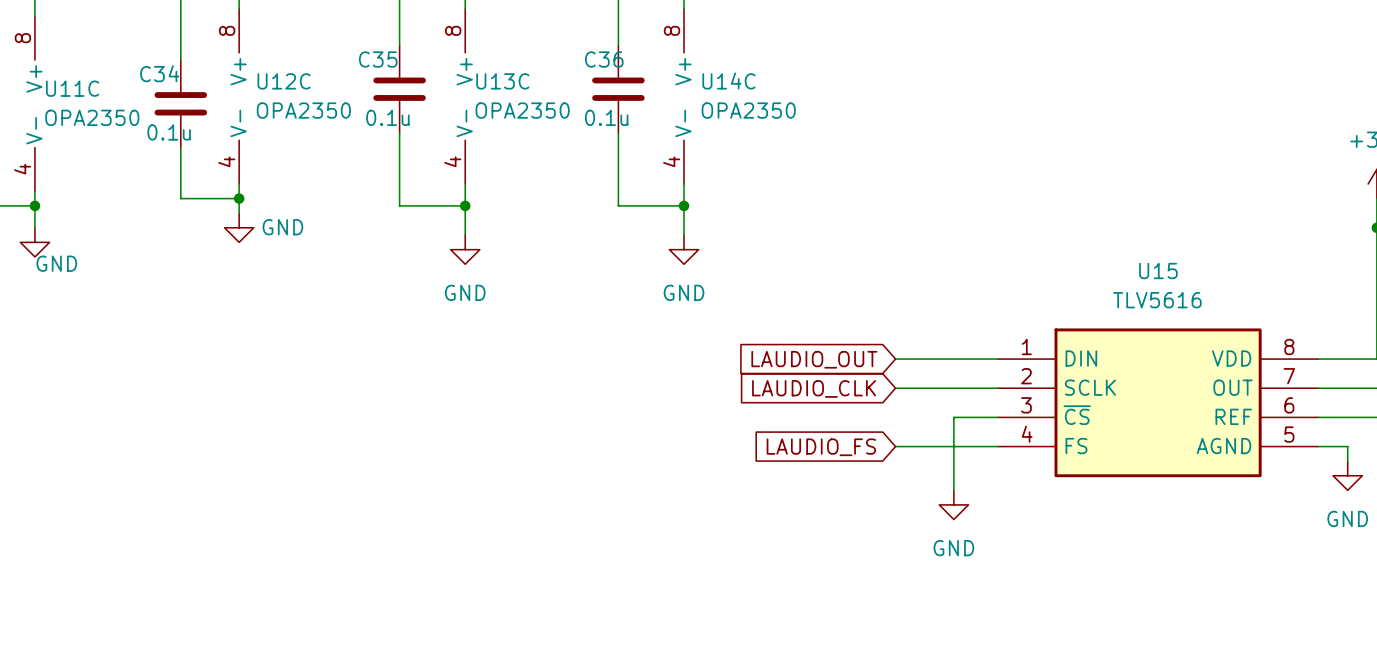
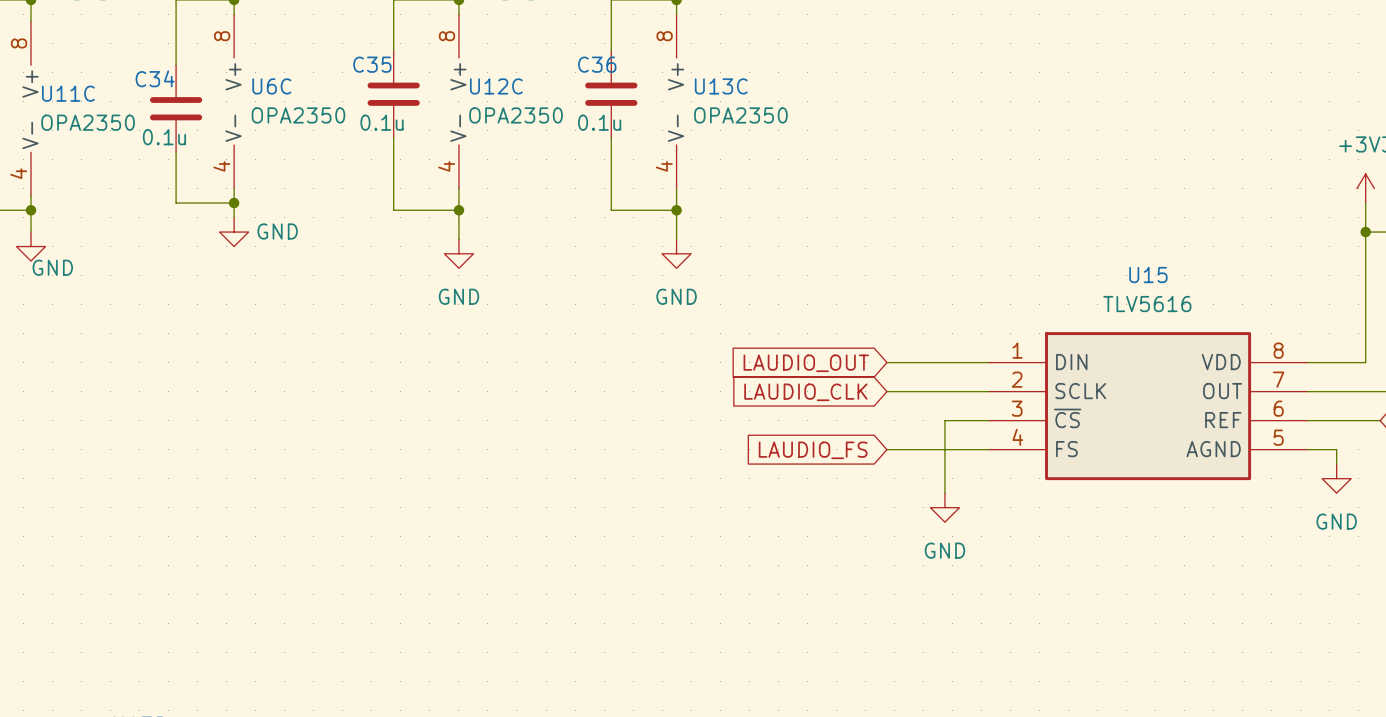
U12C name: U12C (284, 81) -> U6C (271, 86)
U13C name: U13C (502, 81) -> U12C (496, 86)
U14C name: U14C (728, 81) -> U13C (721, 86)

